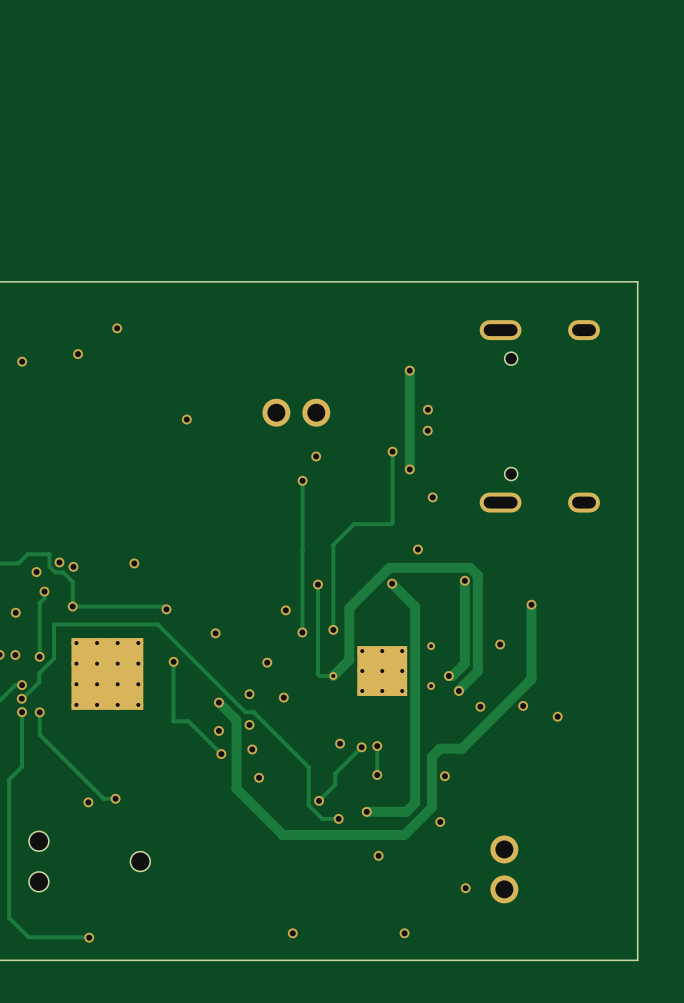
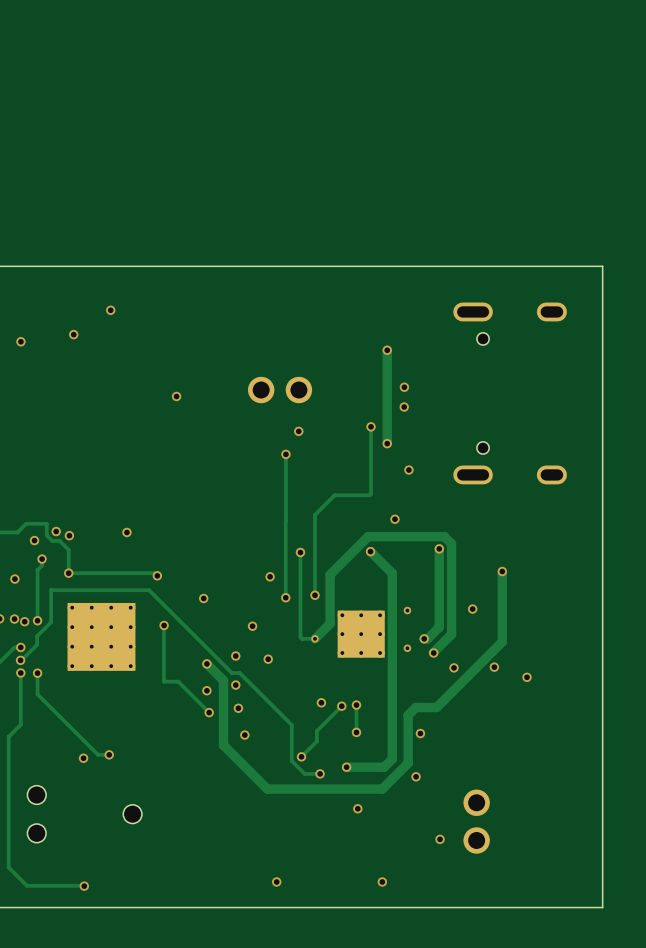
via: none -> (24, 621)

